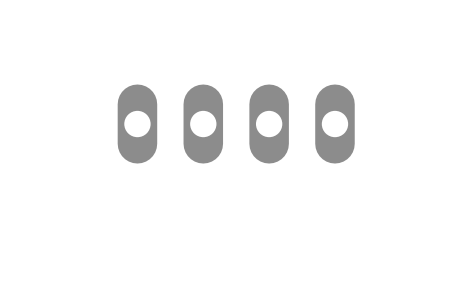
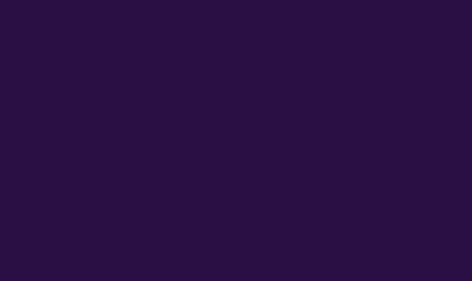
part: (236, 124) -> none

